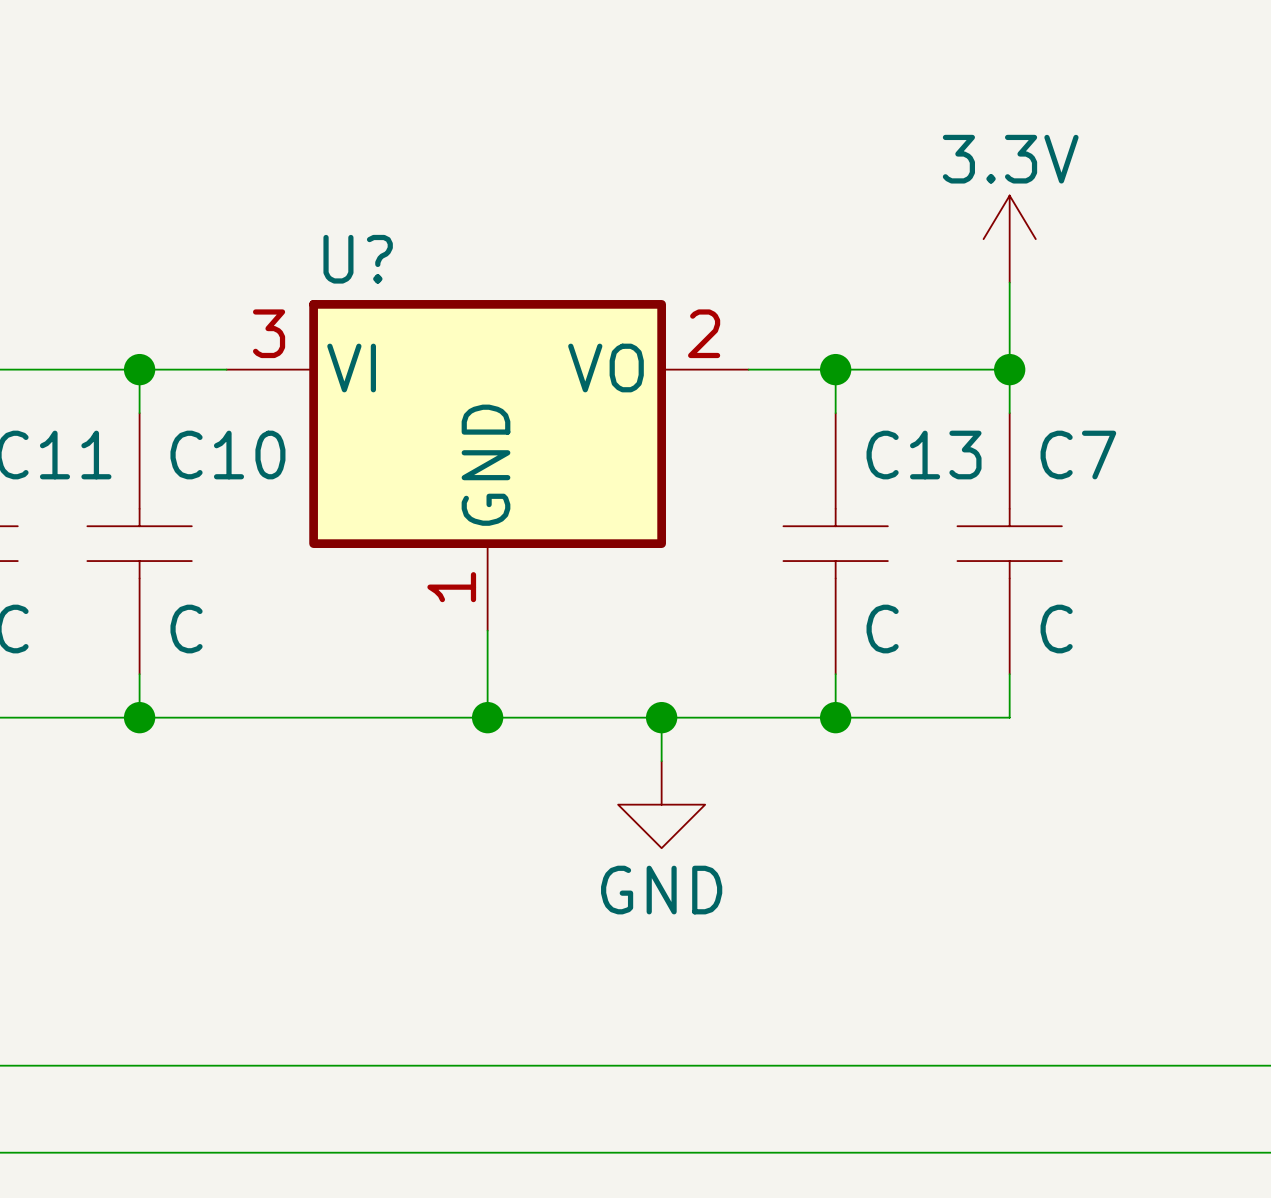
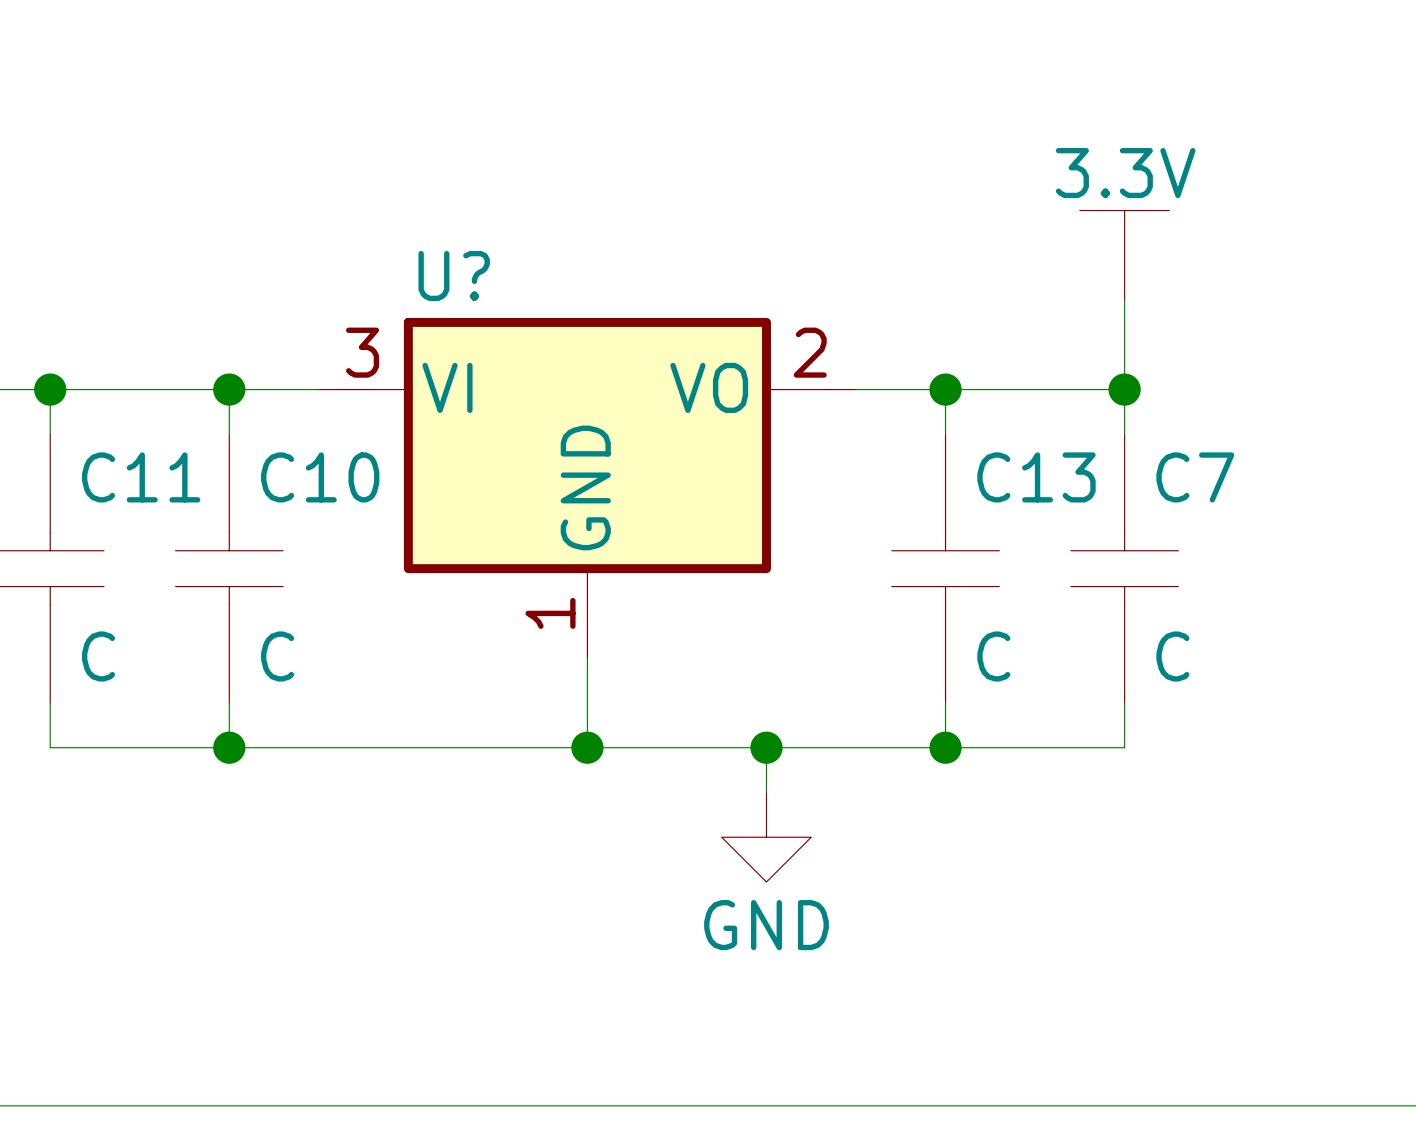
power symbol shape: [983, 195, 1036, 283] -> [1079, 210, 1170, 301]

